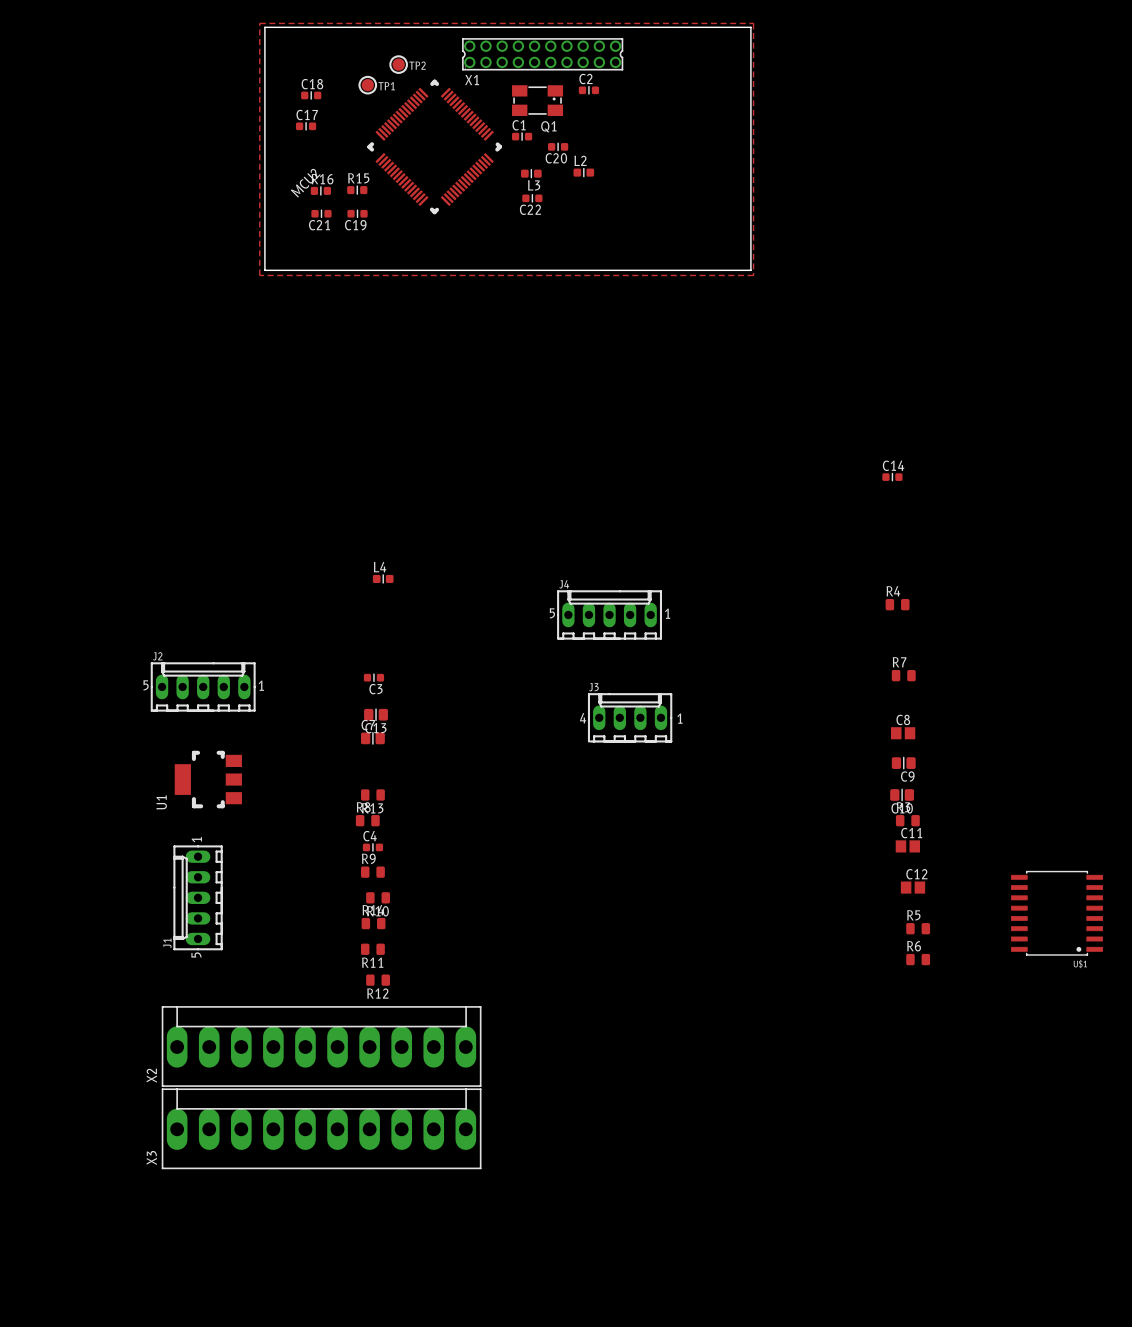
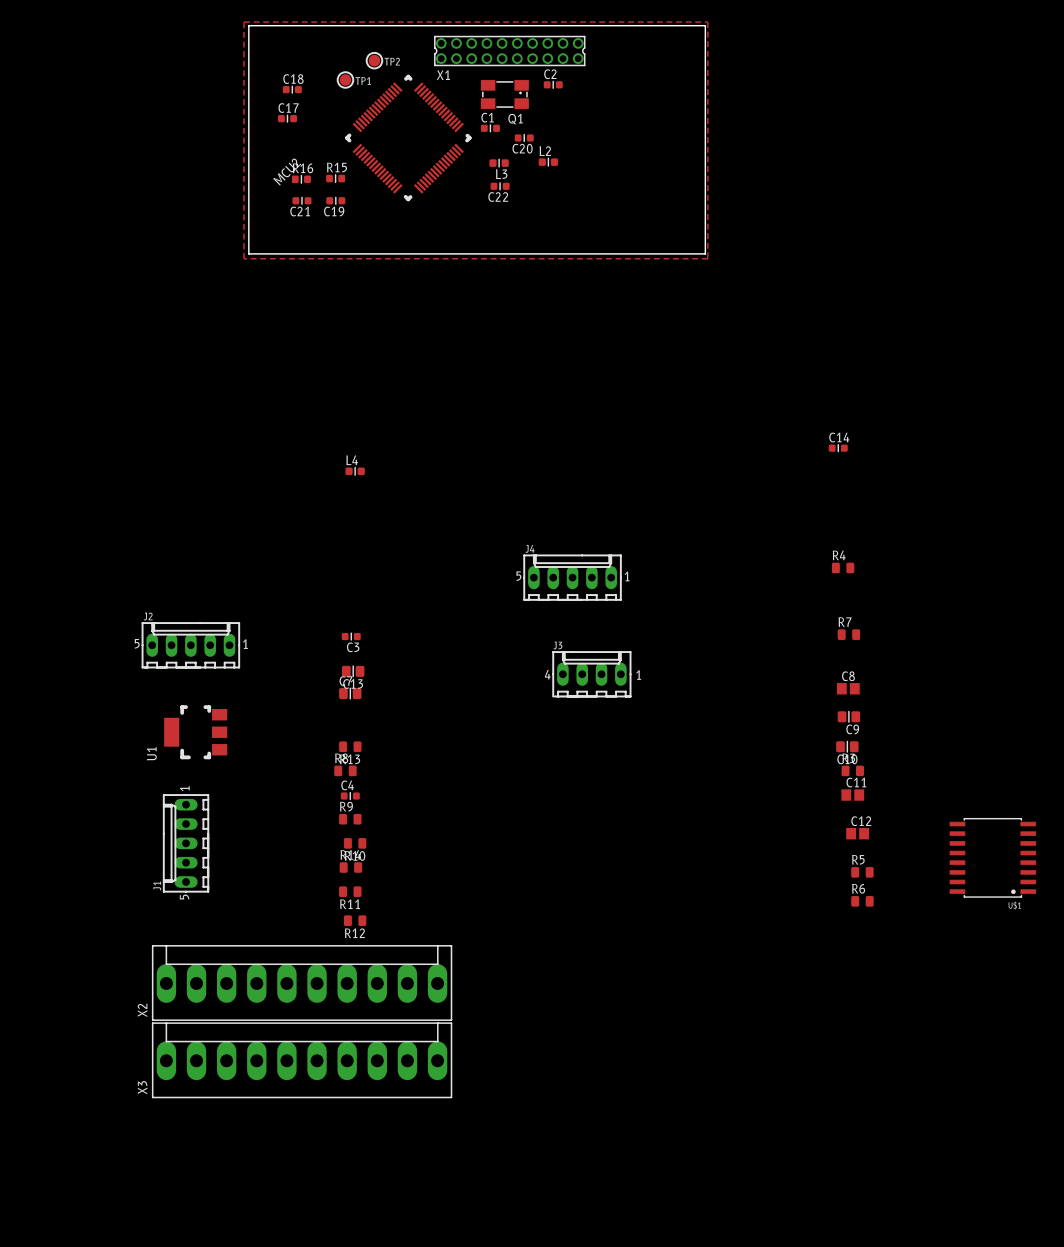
L4 position: (383, 578) -> (355, 471)

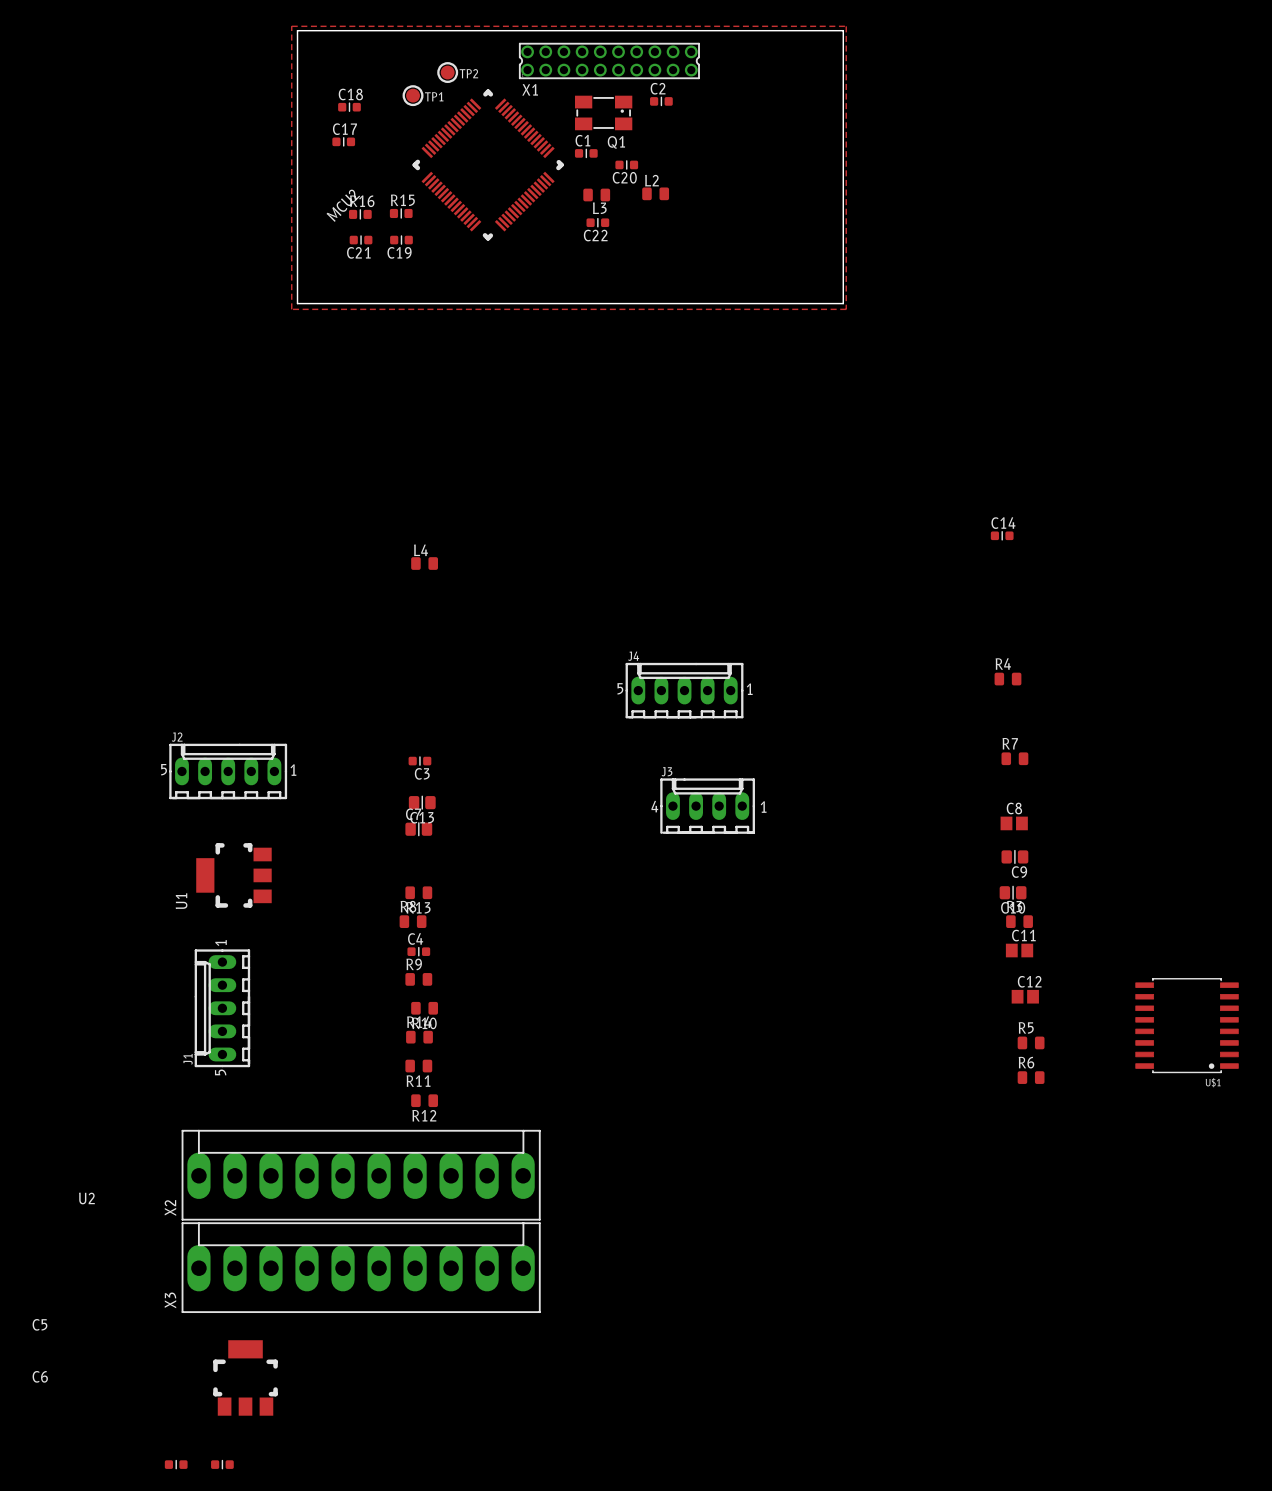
L2 footprint: [538, 157, 559, 167] -> [642, 187, 670, 201]
L3 footprint: [489, 158, 509, 168] -> [583, 188, 611, 202]
L4 footprint: [345, 467, 365, 476] -> [411, 557, 439, 570]
U2: none -> (245, 1377)
C5: none -> (176, 1464)
C6: none -> (222, 1464)

